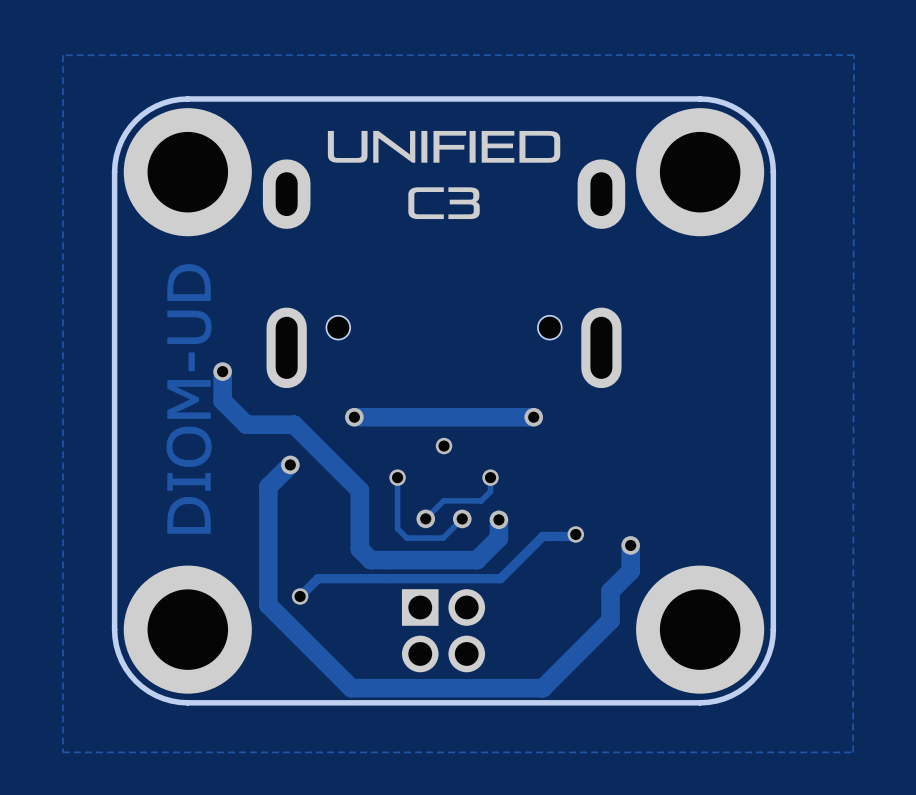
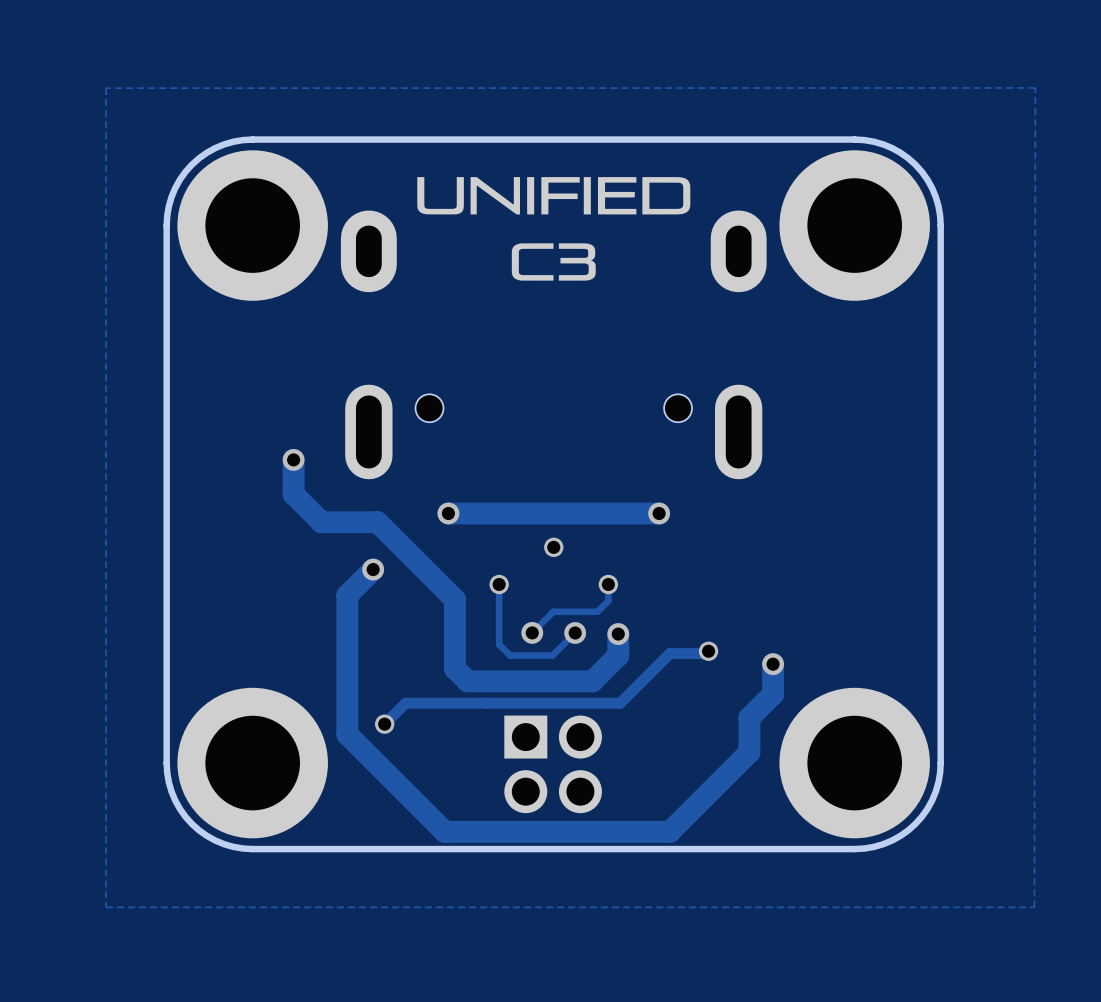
drawing: [166, 264, 212, 534] -> none

